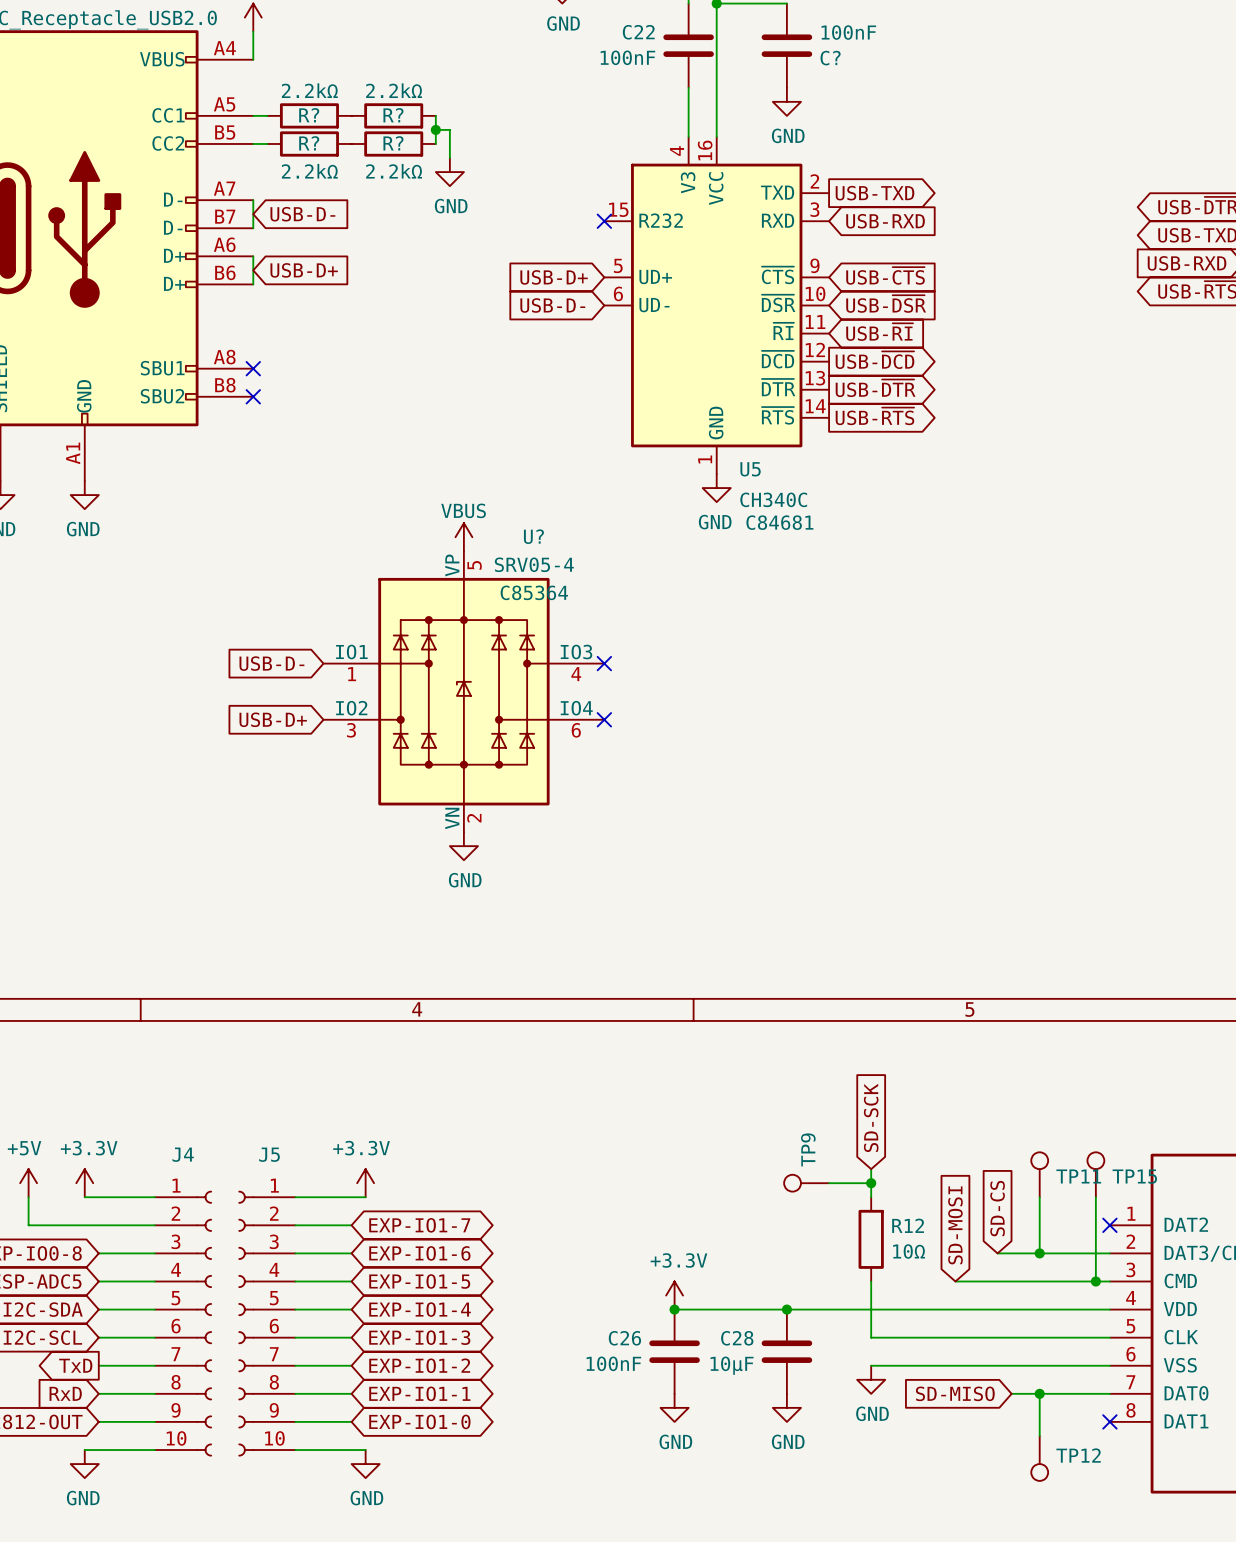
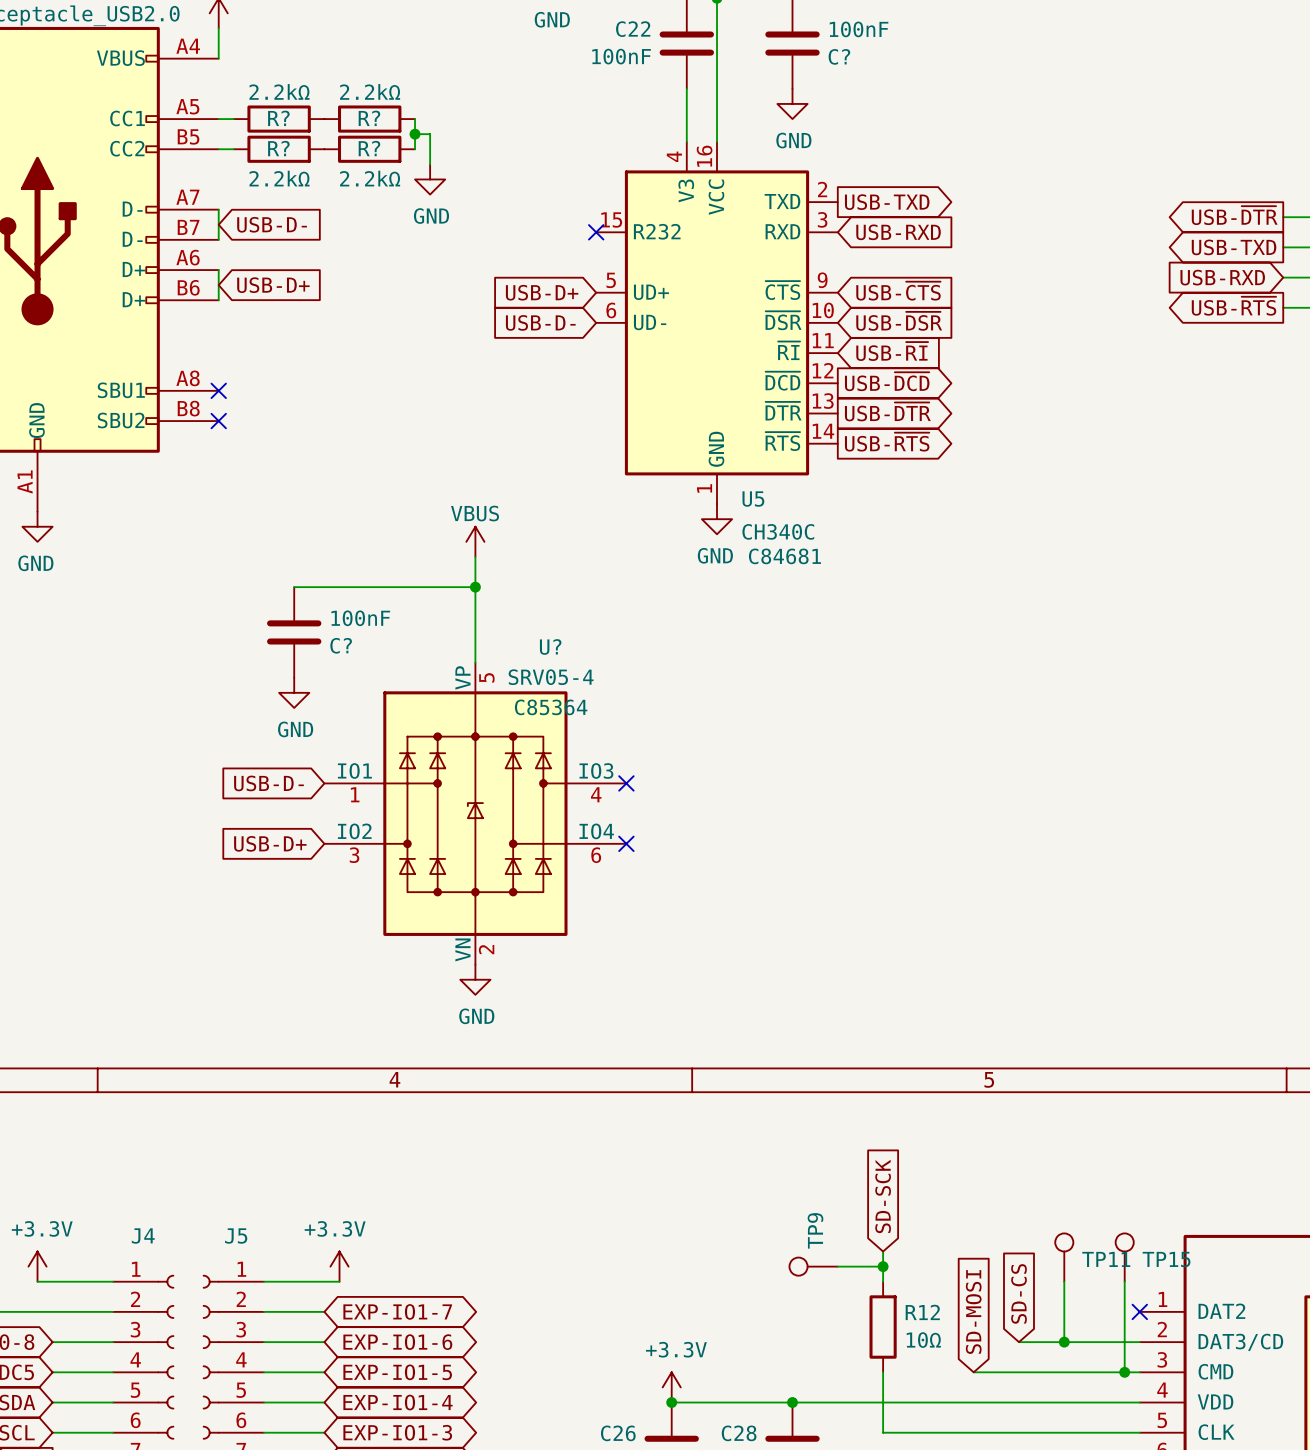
wire: none -> (475, 556) (475, 662)
power symbol position: VBUS (463, 537) -> VBUS (475, 541)
wire: none -> (294, 587) (475, 587)
junction: none -> (475, 587)
C?: none -> 100nF (294, 632)
power symbol: none -> GND (294, 692)
global label position: USB-D- (271, 663) -> USB-D- (268, 783)
no-connect mark: (604, 663) -> none
U? position: (463, 691) -> (475, 813)
global label position: USB-D+ (273, 719) -> USB-D+ (270, 843)
no-connect mark position: (604, 719) -> (626, 783)
no-connect mark: none -> (626, 843)
power symbol position: GND (463, 846) -> GND (475, 979)

